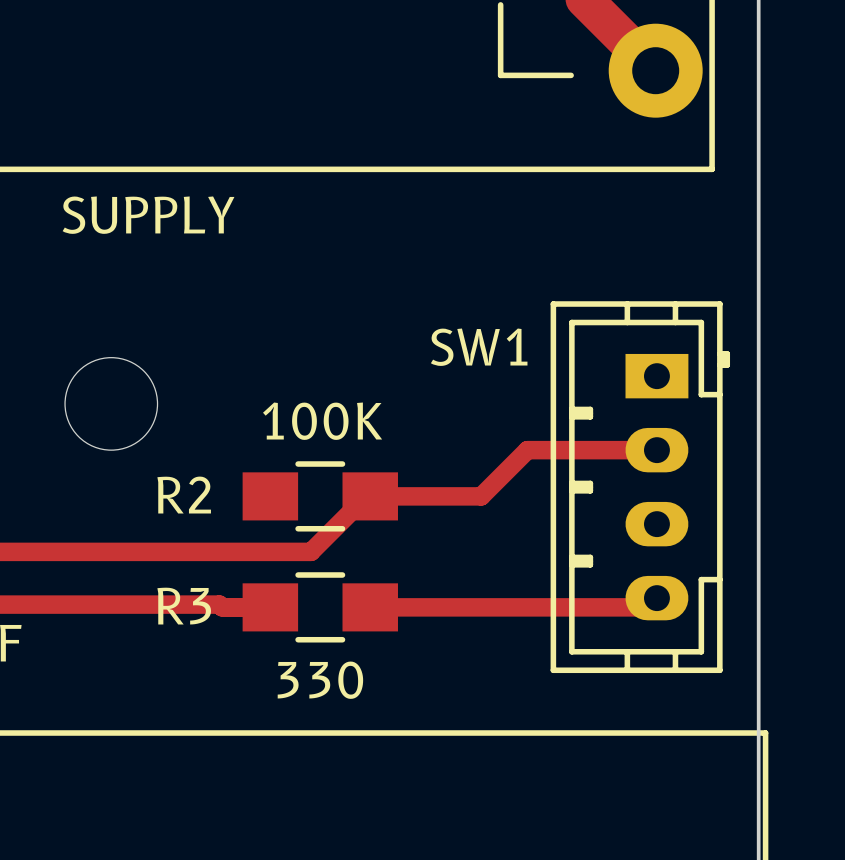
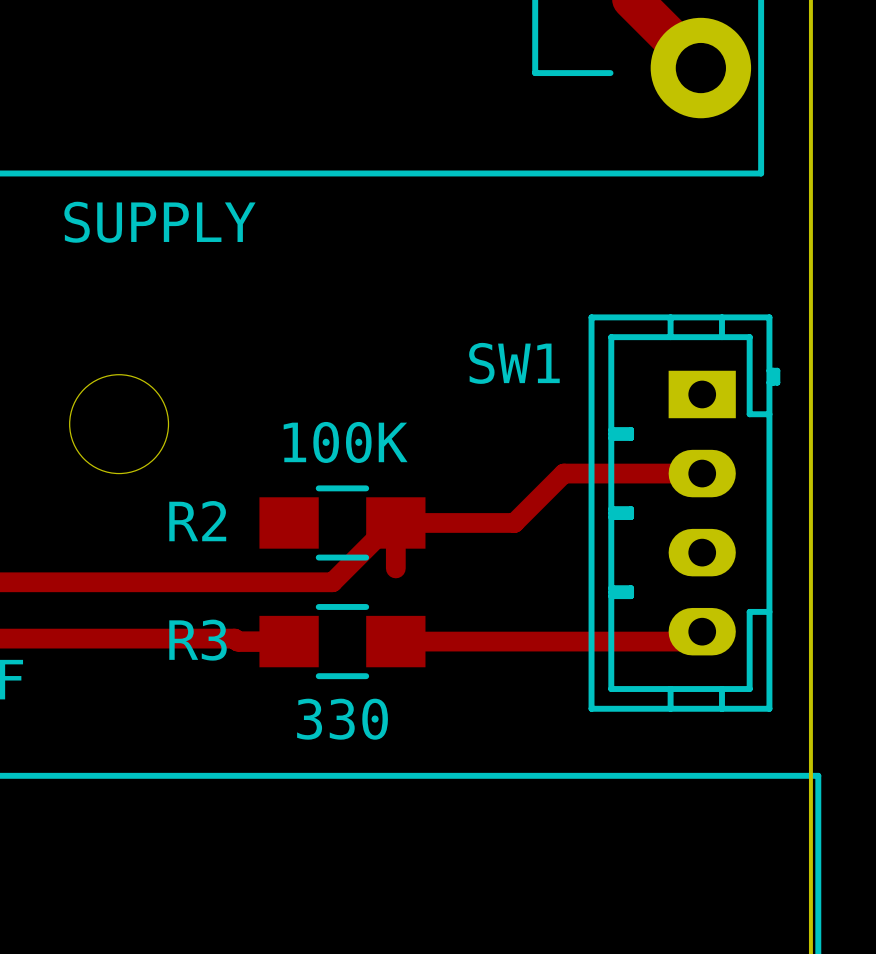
track: none -> (395, 522) (395, 568)

